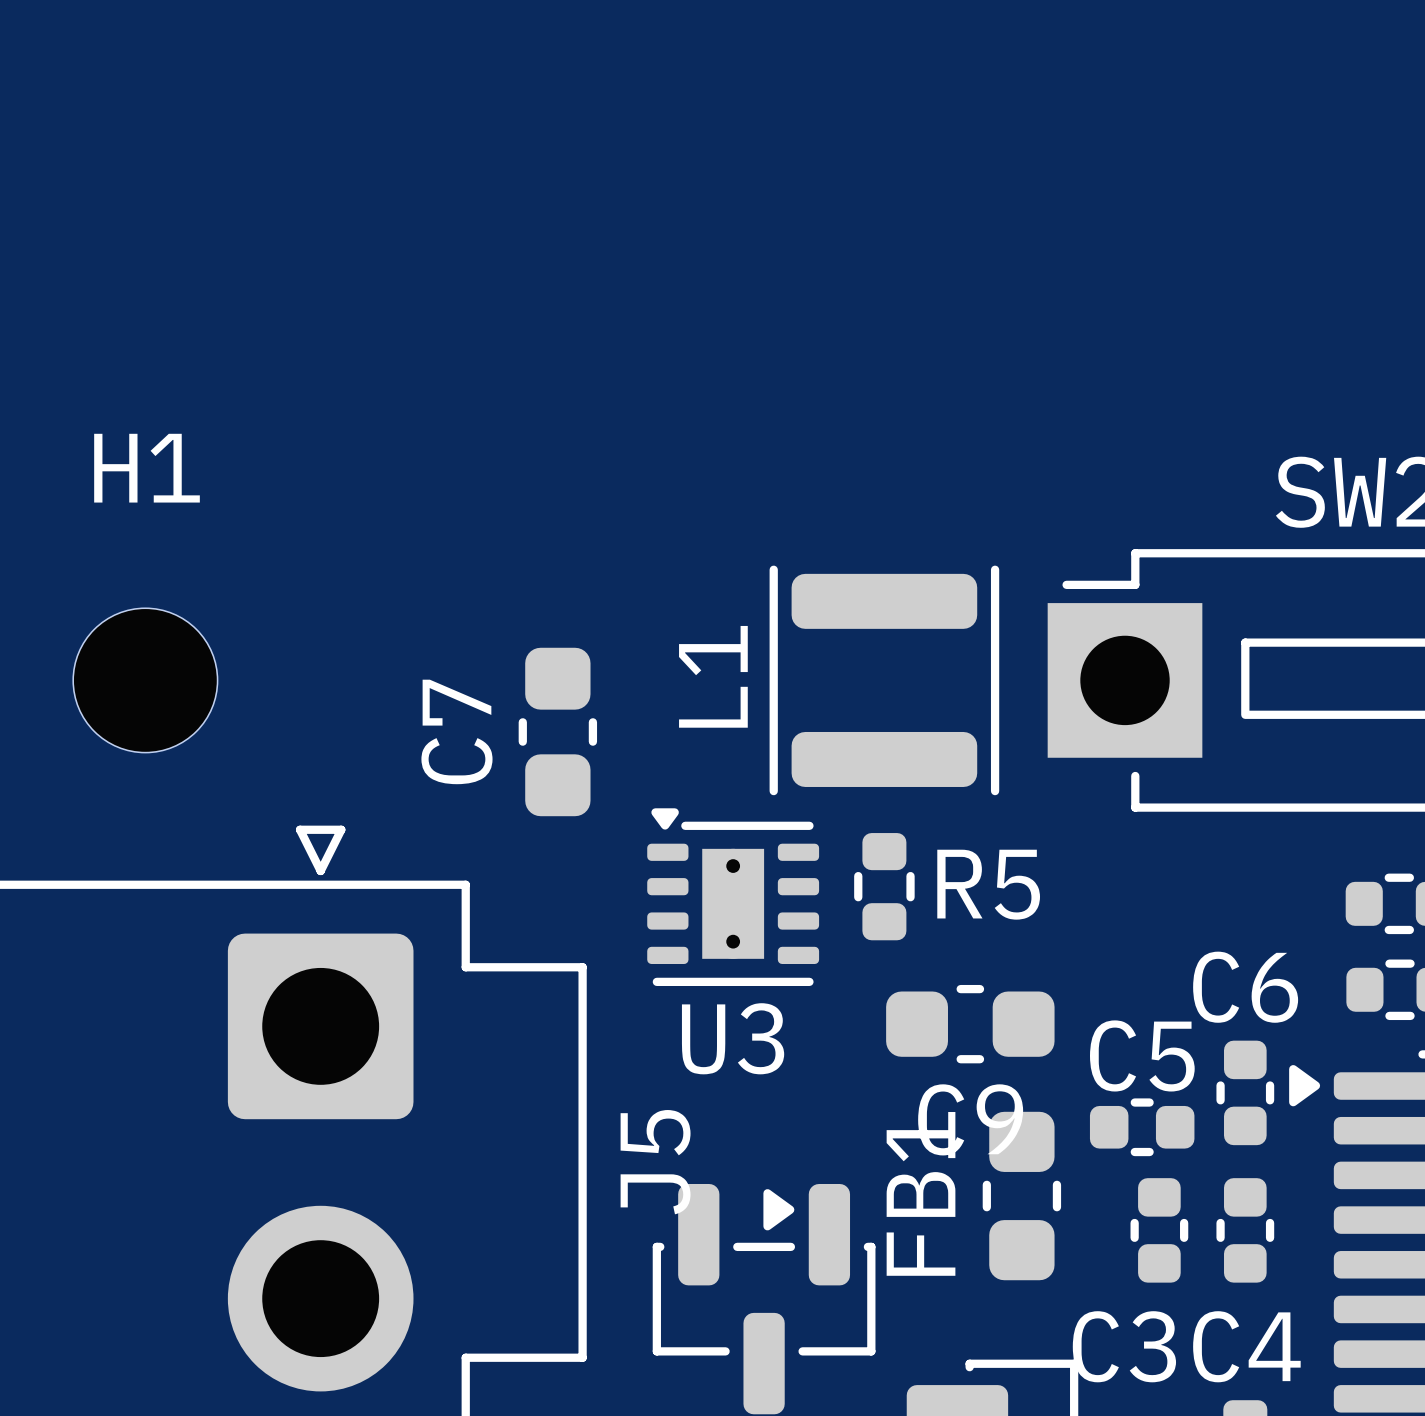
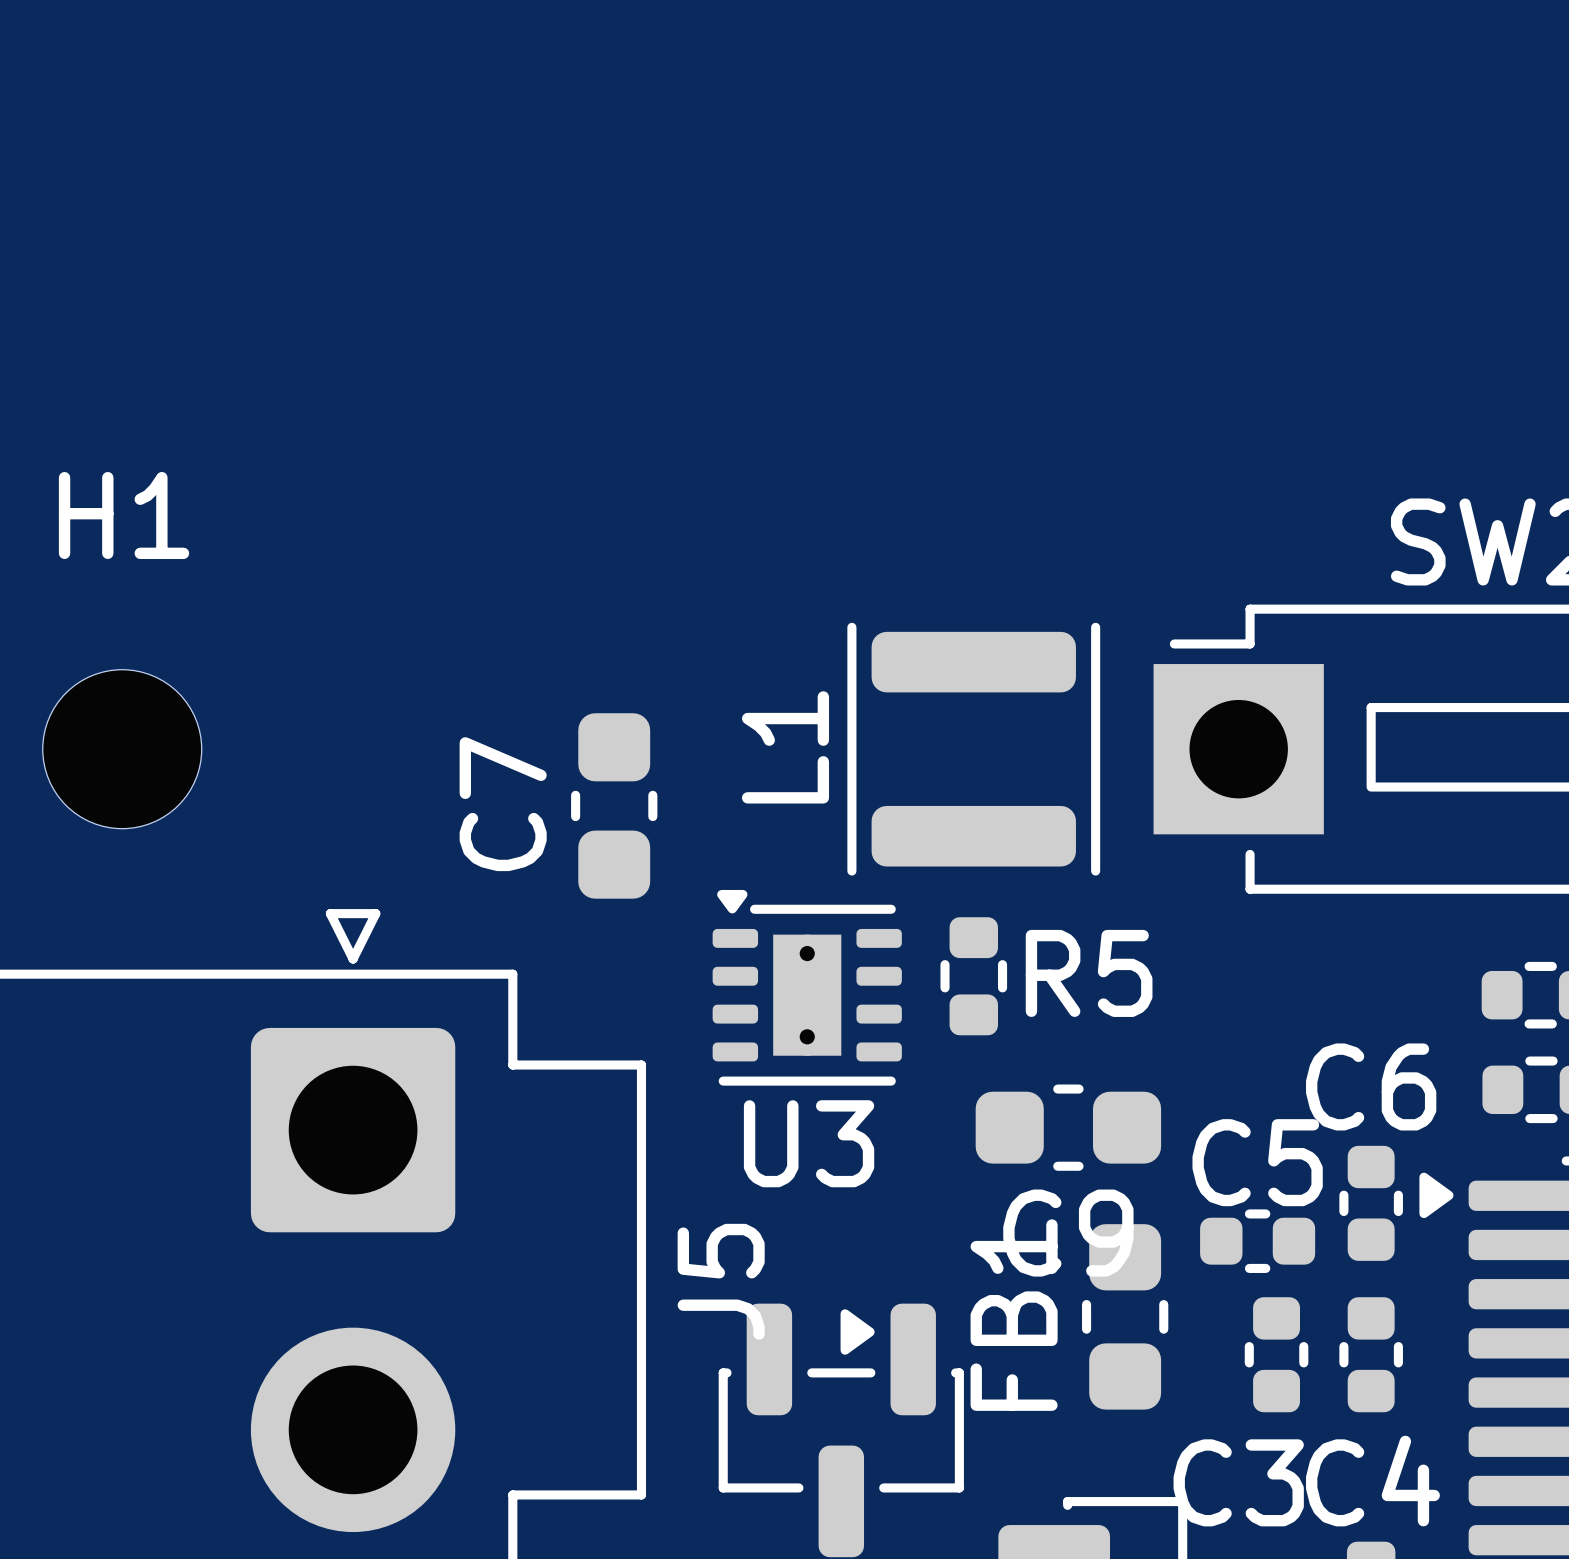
H1 position: (145, 680) -> (122, 749)

